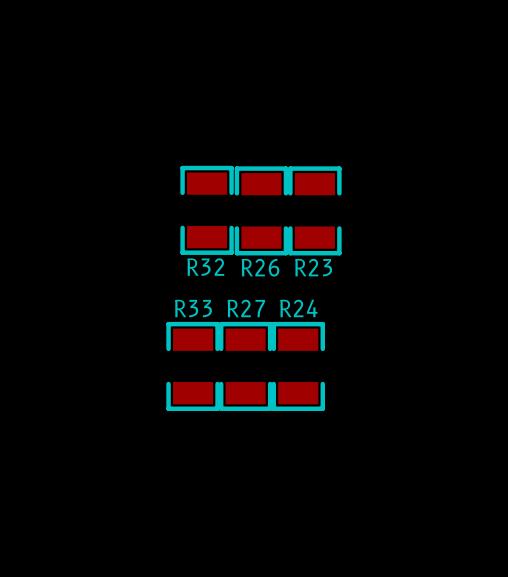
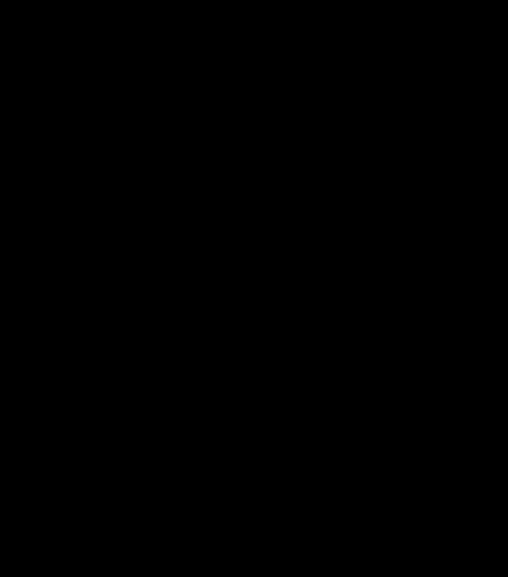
R32: (207, 210) -> none
R26: (261, 210) -> none
R23: (314, 210) -> none
R33: (193, 366) -> none
R27: (245, 366) -> none
R24: (298, 366) -> none

